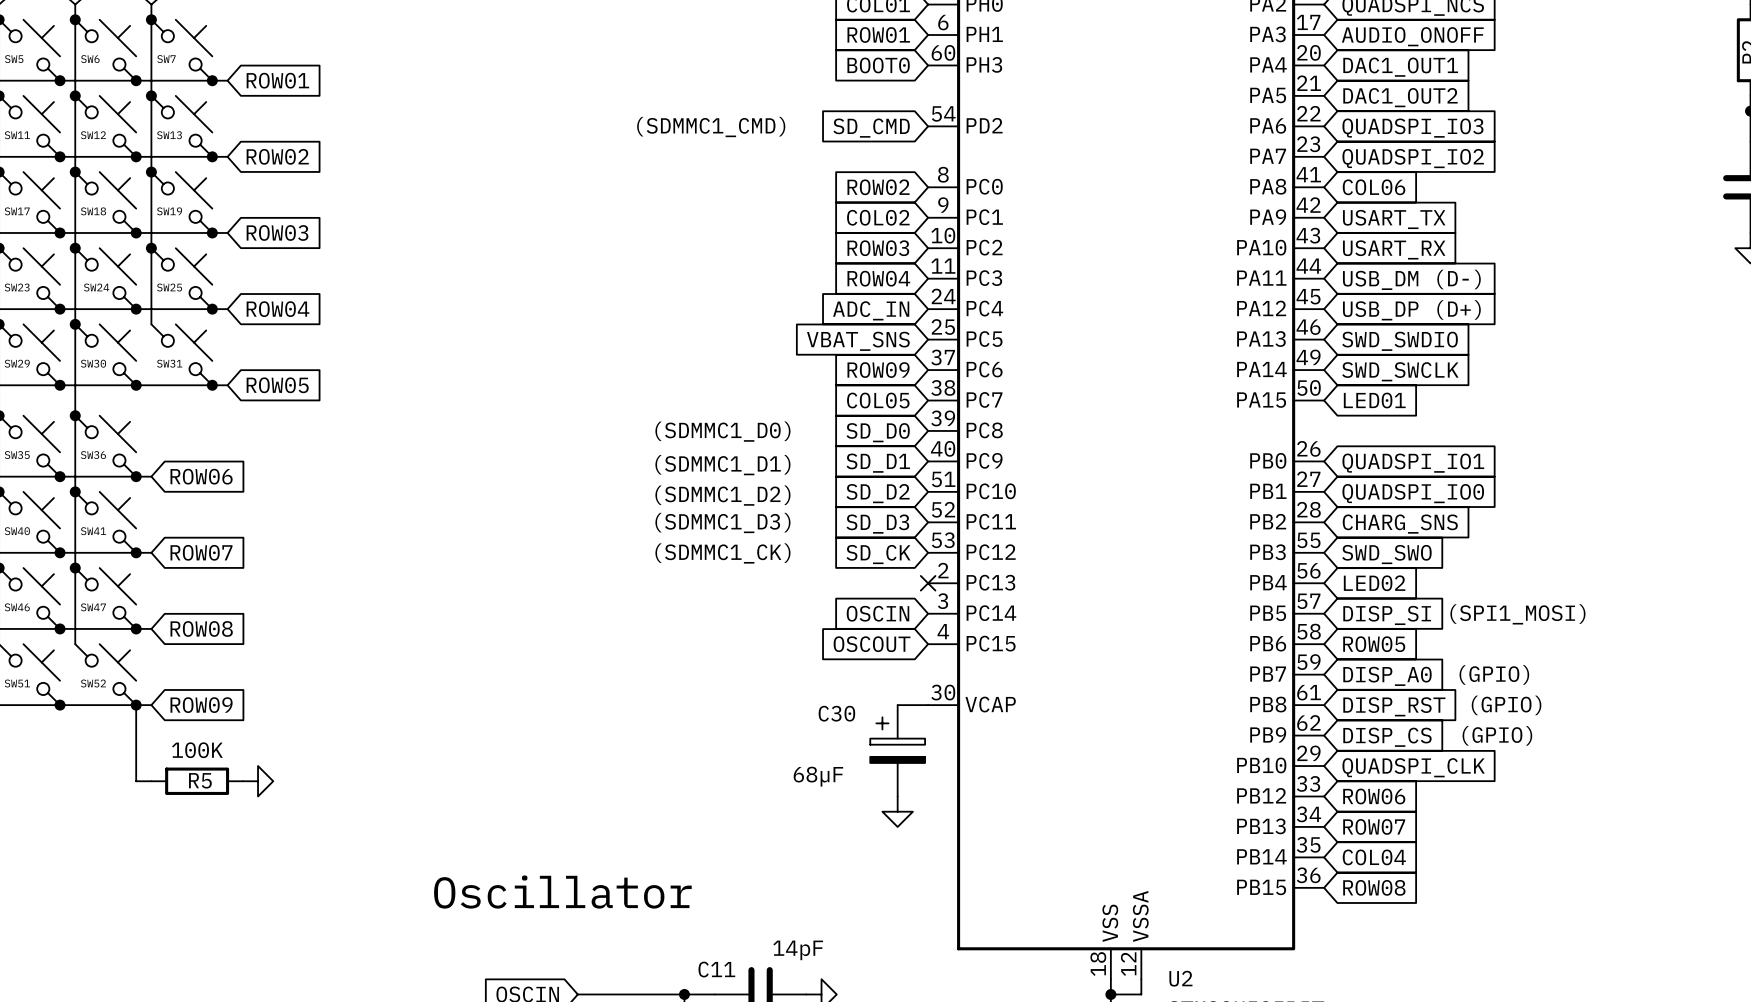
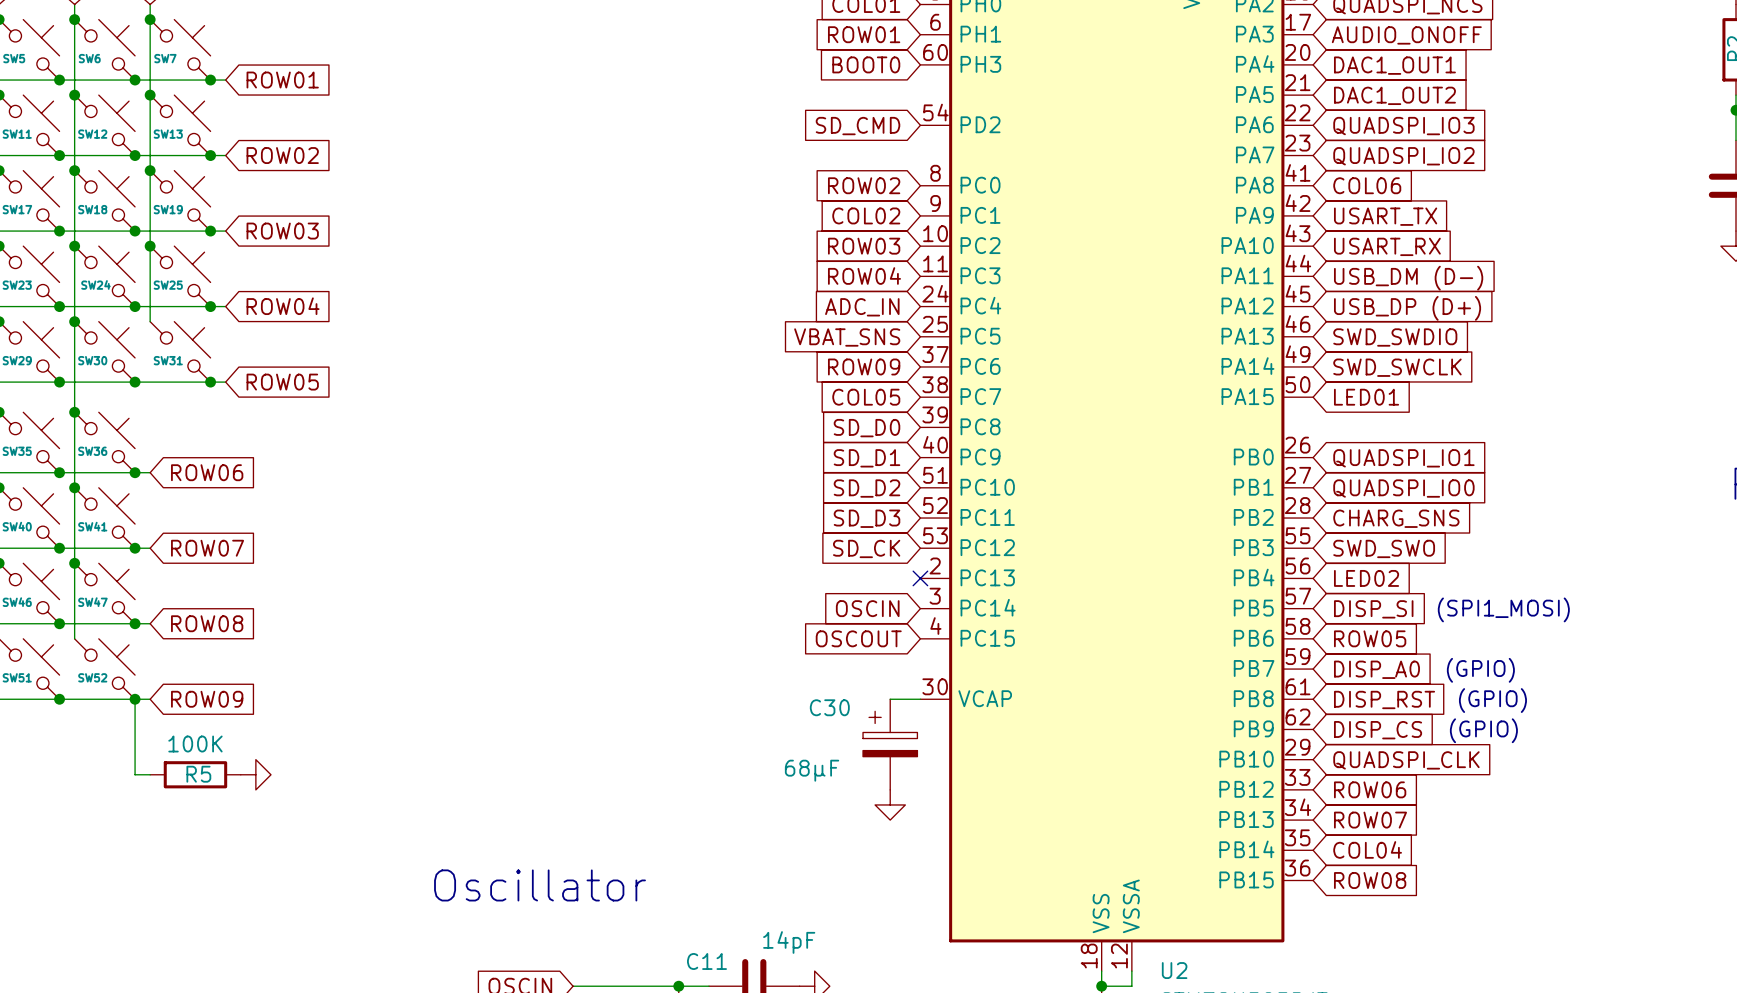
text: (SDMMC1_CMD) (711, 127) -> none
text: (SDMMC1_D0) (722, 431) -> none
text: (SDMMC1_D1) (722, 465) -> none
text: (SDMMC1_D2) (722, 495) -> none
text: (SDMMC1_D3) (722, 523) -> none
text: (SDMMC1_CK) (722, 553) -> none

